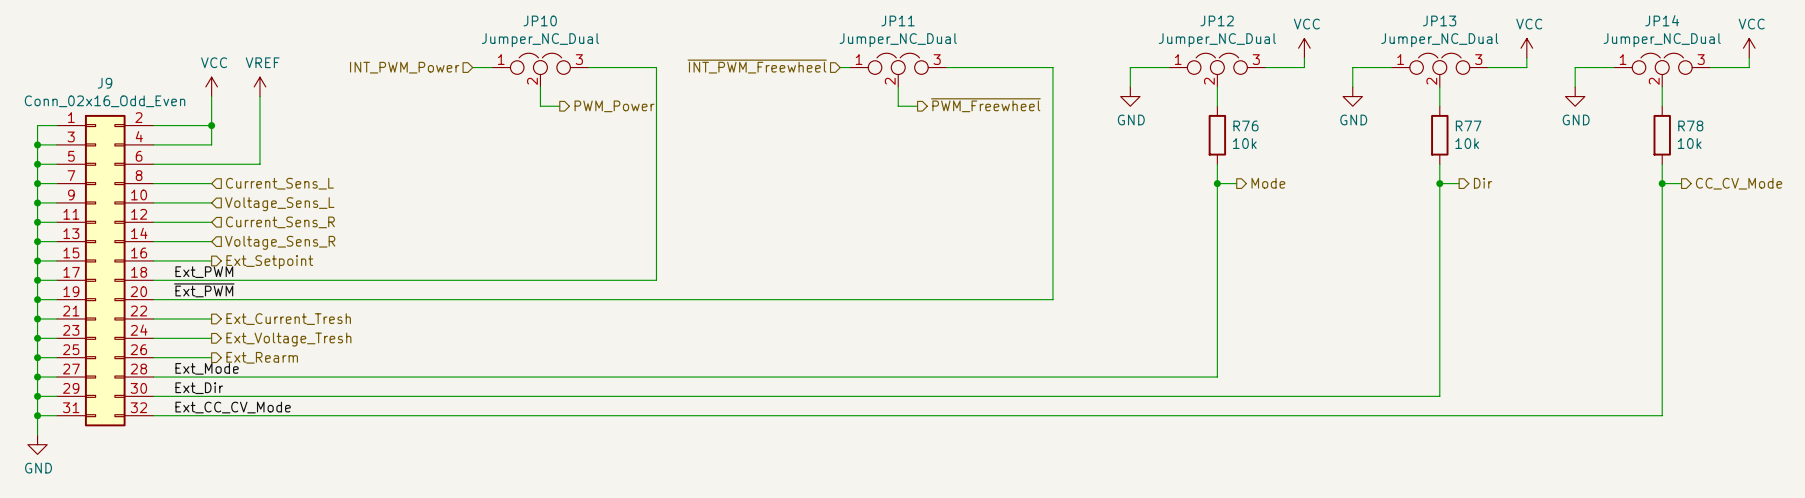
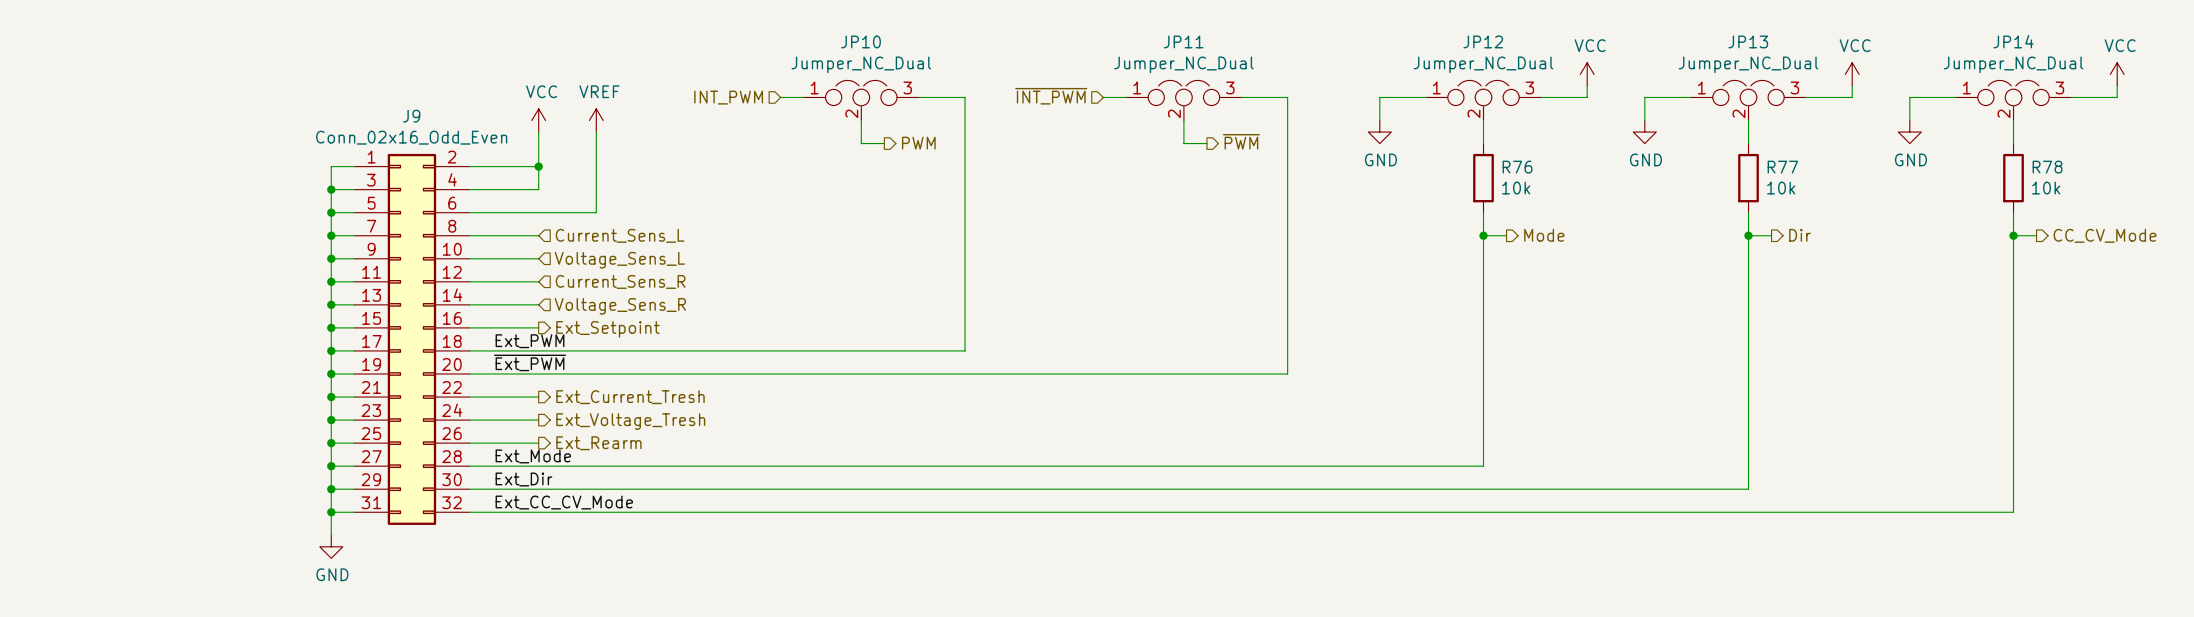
hierarchical label: ~{INT_PWM_Freewheel} (757, 66) -> ~{INT_PWM} (1051, 96)
hierarchical label: INT_PWM_Power (404, 67) -> none
wire: (472, 67) (492, 67) -> none
hierarchical label: none -> INT_PWM (728, 97)
wire: (588, 67) (627, 67) -> none
wire: (646, 67) (656, 67) (656, 280) -> (918, 97) (965, 97) (965, 350) (815, 350)
wire: (840, 67) (849, 67) -> none
wire: none -> (1103, 97) (1126, 97)
wire: (946, 67) (1014, 67) -> none
JP10 position: (540, 70) -> (861, 100)
JP11 position: (898, 70) -> (1183, 100)
power symbol: VCC (211, 86) -> none
power symbol: VREF (259, 86) -> none
power symbol: none -> VCC (538, 120)
power symbol: none -> VREF (596, 120)
wire: (540, 86) (540, 106) (559, 106) -> (861, 120) (861, 143) (884, 143)
wire: (898, 86) (898, 106) (917, 106) -> (1183, 120) (1183, 143) (1206, 143)
wire: (211, 96) (211, 144) (153, 144) -> none
wire: (259, 96) (259, 164) -> (354, 212) (342, 212)
wire: none -> (538, 132) (538, 189) (469, 189)
wire: none -> (596, 132) (596, 212) (469, 212)
hierarchical label: none -> ~{PWM} (1241, 141)
hierarchical label: none -> PWM (918, 143)
hierarchical label: ~{PWM_Freewheel} (985, 105) -> none
hierarchical label: PWM_Power (614, 106) -> none
wire: (56, 125) (37, 125) (37, 435) -> none
wire: (153, 125) (211, 125) -> none
junction: (211, 125) -> none
wire: none -> (354, 166) (331, 166) (331, 535)
wire: none -> (469, 166) (538, 166)
junction: none -> (538, 166)
wire: (37, 144) (56, 144) -> none
junction: (37, 144) -> none
wire: none -> (331, 189) (354, 189)
junction: none -> (331, 189)
wire: (37, 164) (56, 164) -> none
junction: (37, 164) -> none
wire: (153, 164) (250, 164) -> none
junction: none -> (331, 212)
wire: (37, 183) (56, 183) -> none
junction: (37, 183) -> none
wire: (153, 183) (211, 183) -> none
wire: none -> (331, 235) (354, 235)
junction: none -> (331, 235)
hierarchical label: Current_Sens_L (279, 183) -> none
wire: none -> (469, 235) (538, 235)
hierarchical label: none -> Current_Sens_L (620, 235)
wire: (37, 202) (56, 202) -> none
junction: (37, 202) -> none
wire: (153, 202) (211, 202) -> none
wire: none -> (331, 258) (354, 258)
junction: none -> (331, 258)
wire: none -> (469, 258) (538, 258)
hierarchical label: Voltage_Sens_L (279, 204) -> none
hierarchical label: none -> Voltage_Sens_L (619, 260)
wire: (37, 222) (56, 222) -> none
junction: (37, 222) -> none
wire: (153, 222) (211, 222) -> none
wire: none -> (331, 281) (354, 281)
junction: none -> (331, 281)
hierarchical label: Current_Sens_R (280, 222) -> none
wire: none -> (469, 281) (538, 281)
hierarchical label: none -> Current_Sens_R (620, 281)
wire: (37, 241) (56, 241) -> none
junction: (37, 241) -> none
wire: (153, 241) (211, 241) -> none
wire: none -> (331, 304) (354, 304)
junction: none -> (331, 304)
wire: none -> (469, 304) (538, 304)
hierarchical label: Voltage_Sens_R (280, 242) -> none
hierarchical label: none -> Voltage_Sens_R (620, 306)
wire: (37, 260) (56, 260) -> none
junction: (37, 260) -> none
wire: (153, 260) (211, 260) -> none
wire: none -> (331, 327) (354, 327)
junction: none -> (331, 327)
wire: none -> (469, 327) (538, 327)
hierarchical label: Ext_Setpoint (269, 262) -> none
hierarchical label: none -> Ext_Setpoint (608, 329)
J9 position: (105, 270) -> (411, 339)
label: Ext_PWM (204, 272) -> none
label: none -> Ext_PWM (530, 341)
wire: (37, 280) (56, 280) -> none
junction: (37, 280) -> none
wire: (153, 280) (250, 280) -> none
junction: none -> (331, 350)
label: ~{Ext_PWM} (204, 290) -> none
label: none -> ~{Ext_PWM} (530, 362)
wire: (37, 299) (56, 299) -> none
junction: (37, 299) -> none
wire: (153, 299) (250, 299) -> none
junction: none -> (331, 374)
wire: (37, 318) (56, 318) -> none
junction: (37, 318) -> none
wire: (153, 318) (211, 318) -> none
wire: none -> (331, 397) (354, 397)
junction: none -> (331, 397)
wire: none -> (469, 397) (538, 397)
hierarchical label: Ext_Current_Tresh (288, 319) -> none
hierarchical label: none -> Ext_Current_Tresh (630, 397)
wire: (37, 338) (56, 338) -> none
junction: (37, 338) -> none
wire: (153, 338) (211, 338) -> none
wire: none -> (331, 420) (354, 420)
junction: none -> (331, 420)
wire: none -> (469, 420) (538, 420)
hierarchical label: Ext_Voltage_Tresh (288, 339) -> none
hierarchical label: none -> Ext_Voltage_Tresh (630, 421)
wire: (37, 357) (56, 357) -> none
junction: (37, 357) -> none
wire: (153, 357) (211, 357) -> none
wire: none -> (331, 443) (354, 443)
junction: none -> (331, 443)
hierarchical label: Ext_Rearm (262, 357) -> none
wire: none -> (469, 443) (538, 443)
hierarchical label: none -> Ext_Rearm (598, 443)
label: Ext_Mode (207, 368) -> none
label: none -> Ext_Mode (533, 456)
wire: (37, 377) (56, 377) -> none
junction: (37, 377) -> none
wire: (153, 377) (250, 377) -> none
junction: none -> (331, 466)
label: Ext_Dir (199, 388) -> none
label: none -> Ext_Dir (523, 479)
wire: (37, 396) (56, 396) -> none
junction: (37, 396) -> none
wire: (153, 396) (250, 396) -> none
junction: none -> (331, 489)
label: Ext_CC_CV_Mode (233, 407) -> none
label: none -> Ext_CC_CV_Mode (564, 502)
wire: (37, 415) (56, 415) -> none
junction: (37, 415) -> none
wire: (153, 415) (250, 415) -> none
junction: none -> (331, 512)
power symbol: GND (37, 444) -> none
power symbol: none -> GND (331, 546)

